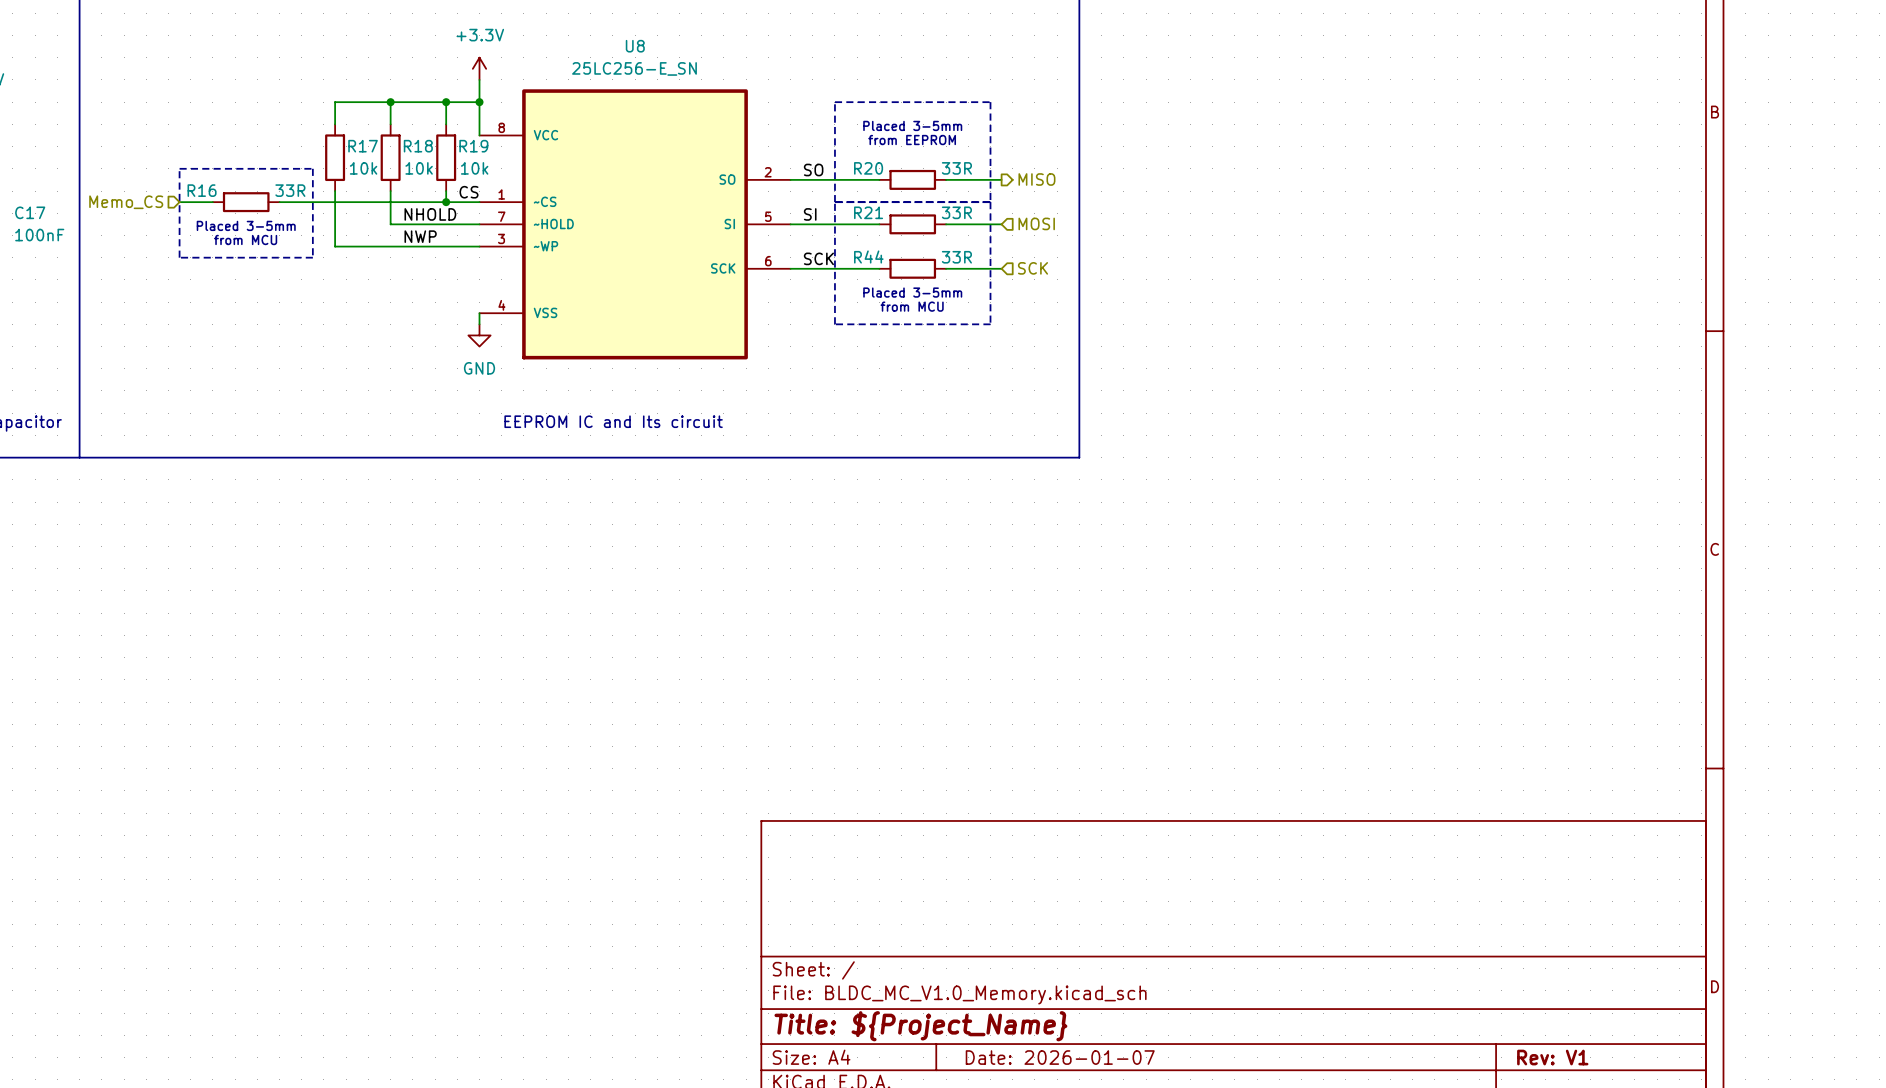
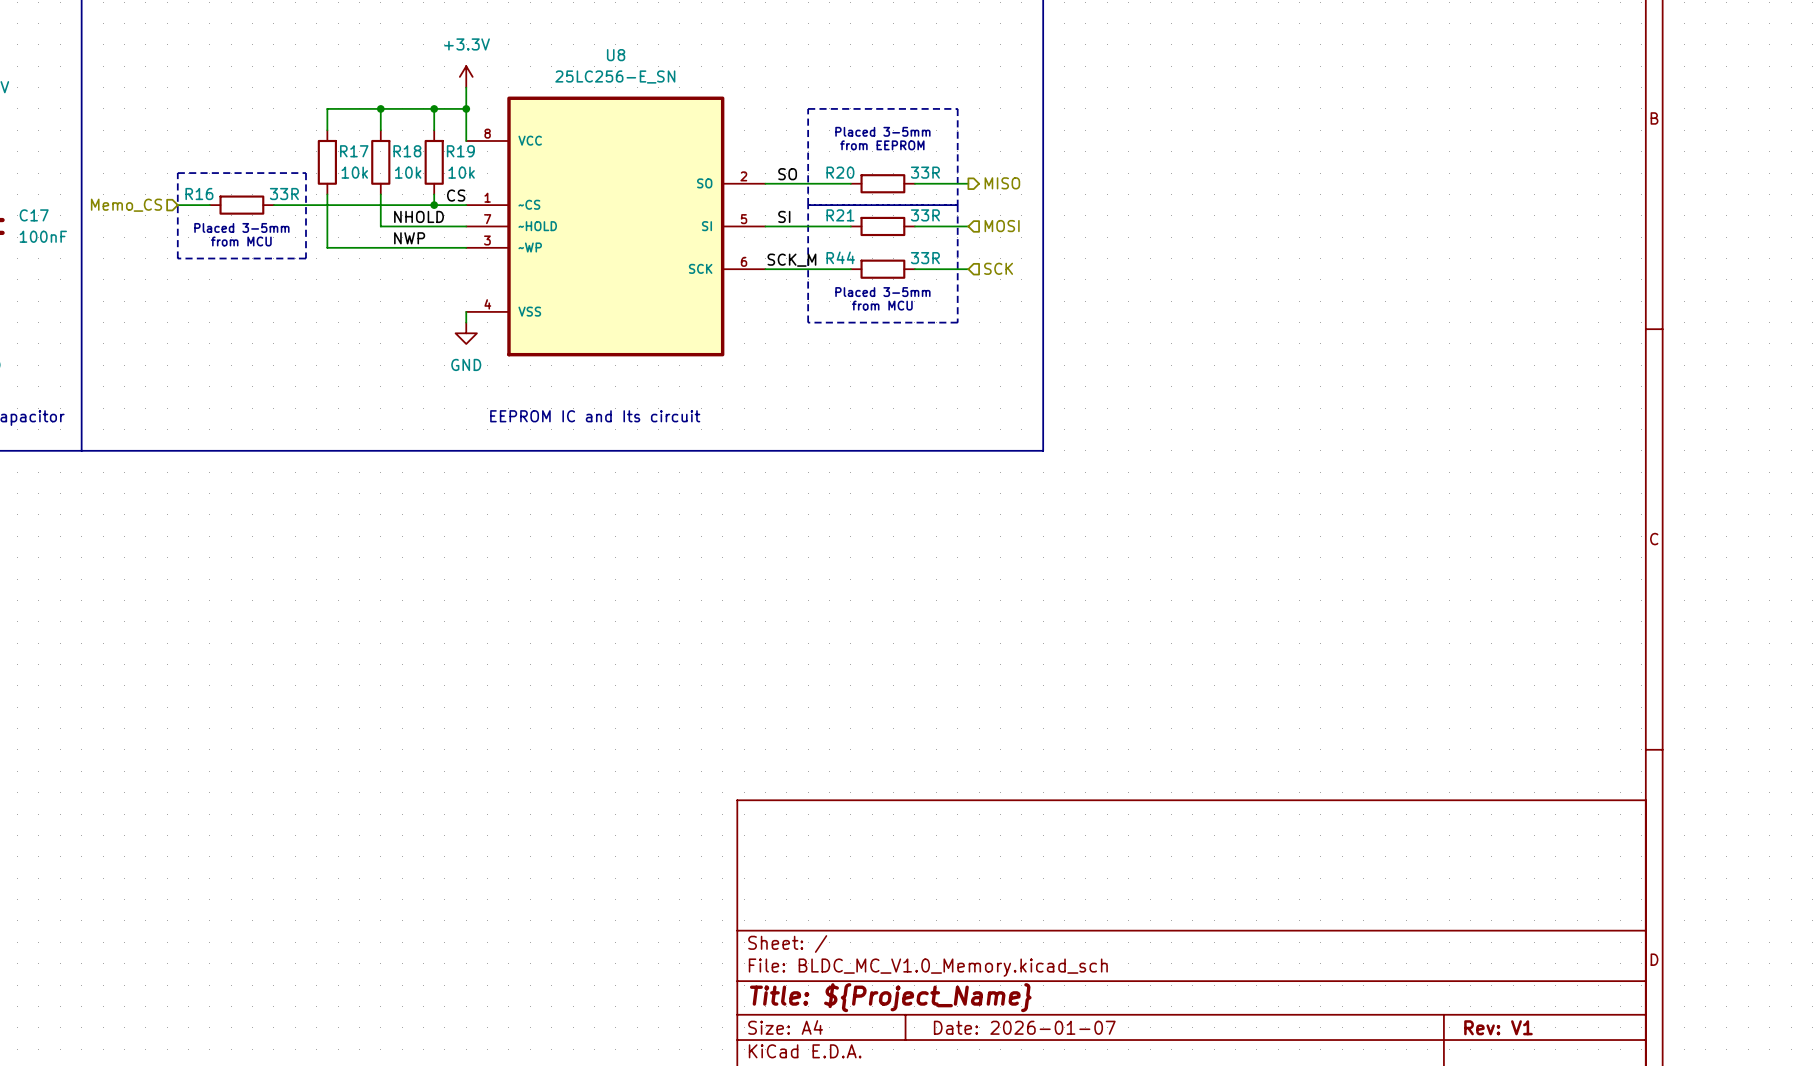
label: SCK (818, 258) -> SCK_M (791, 260)

